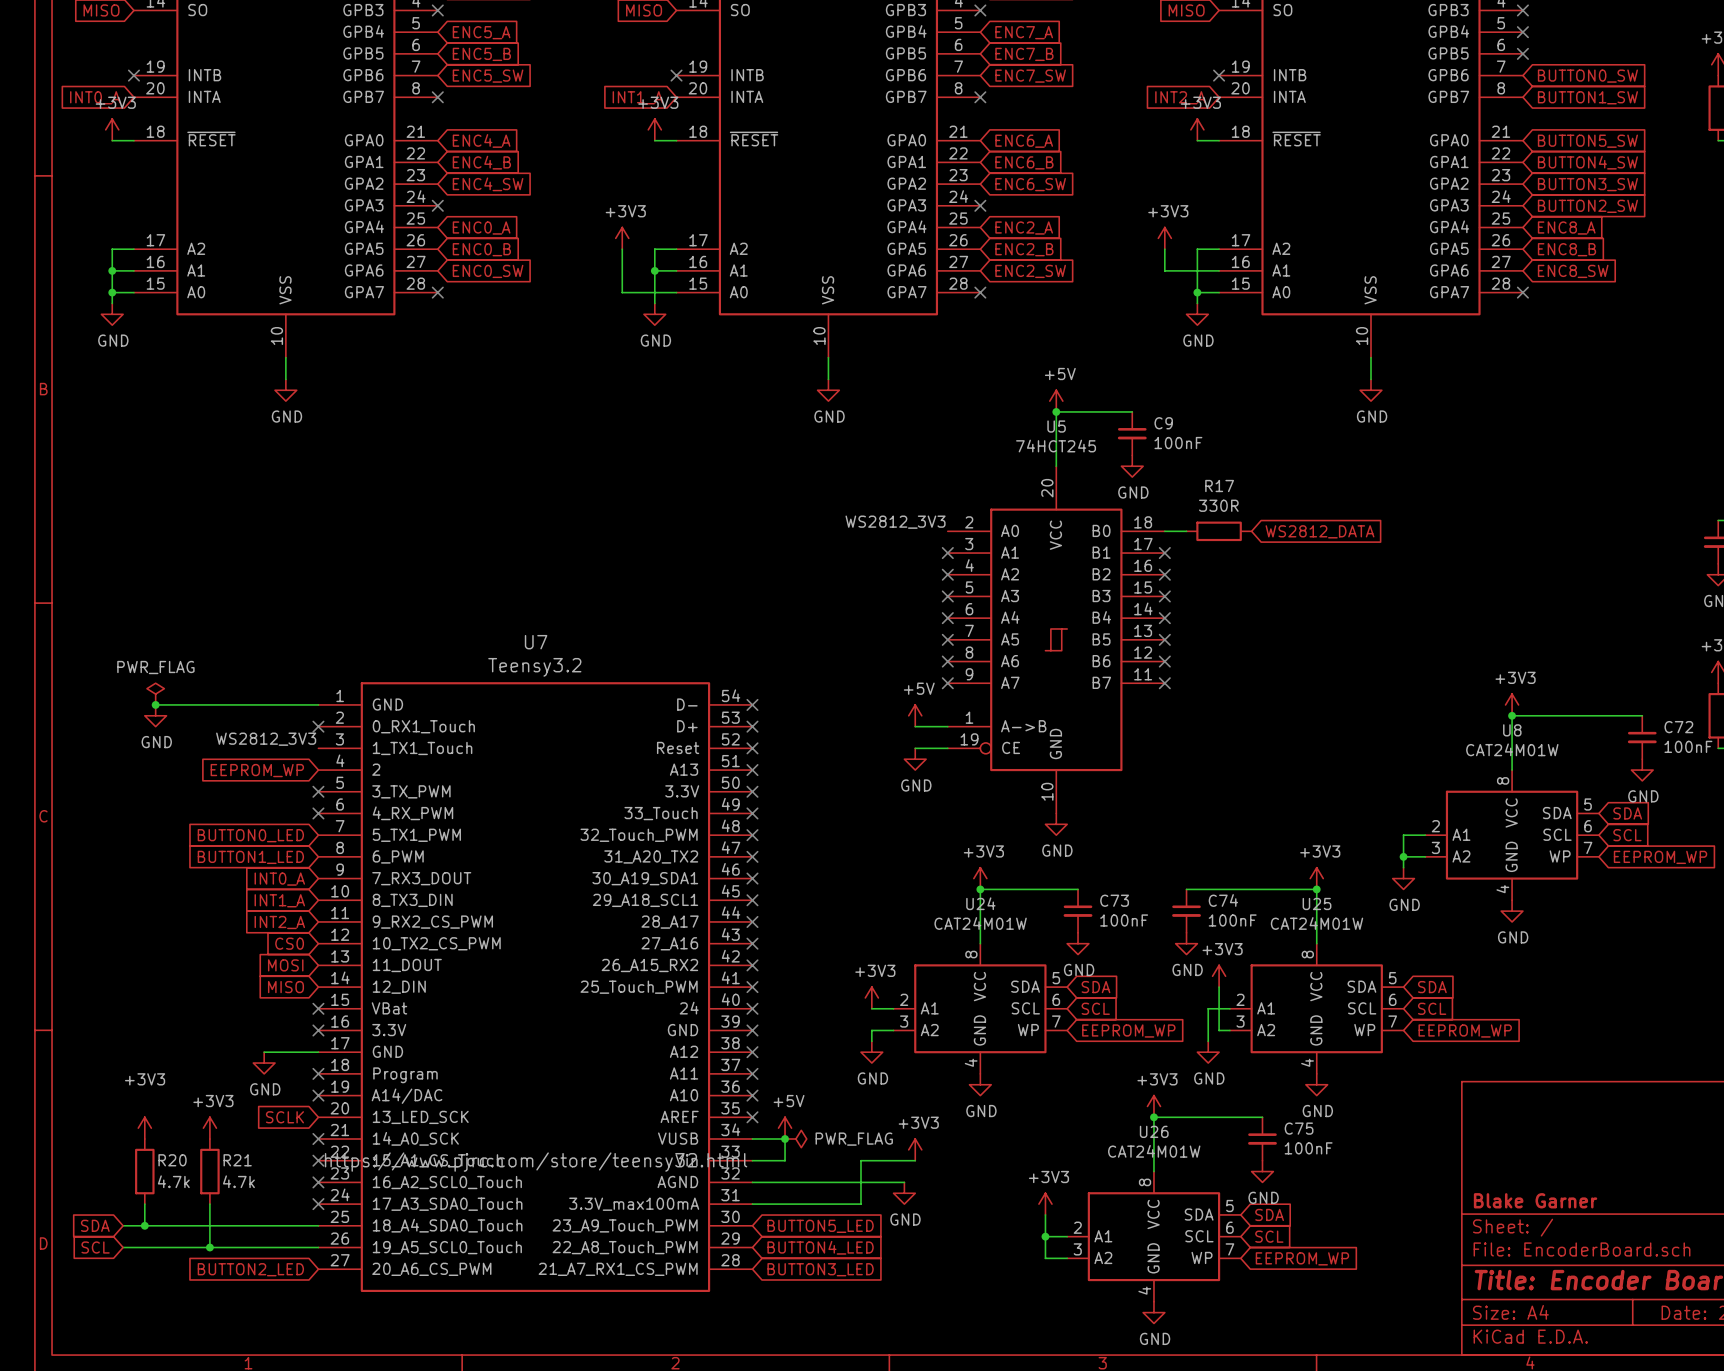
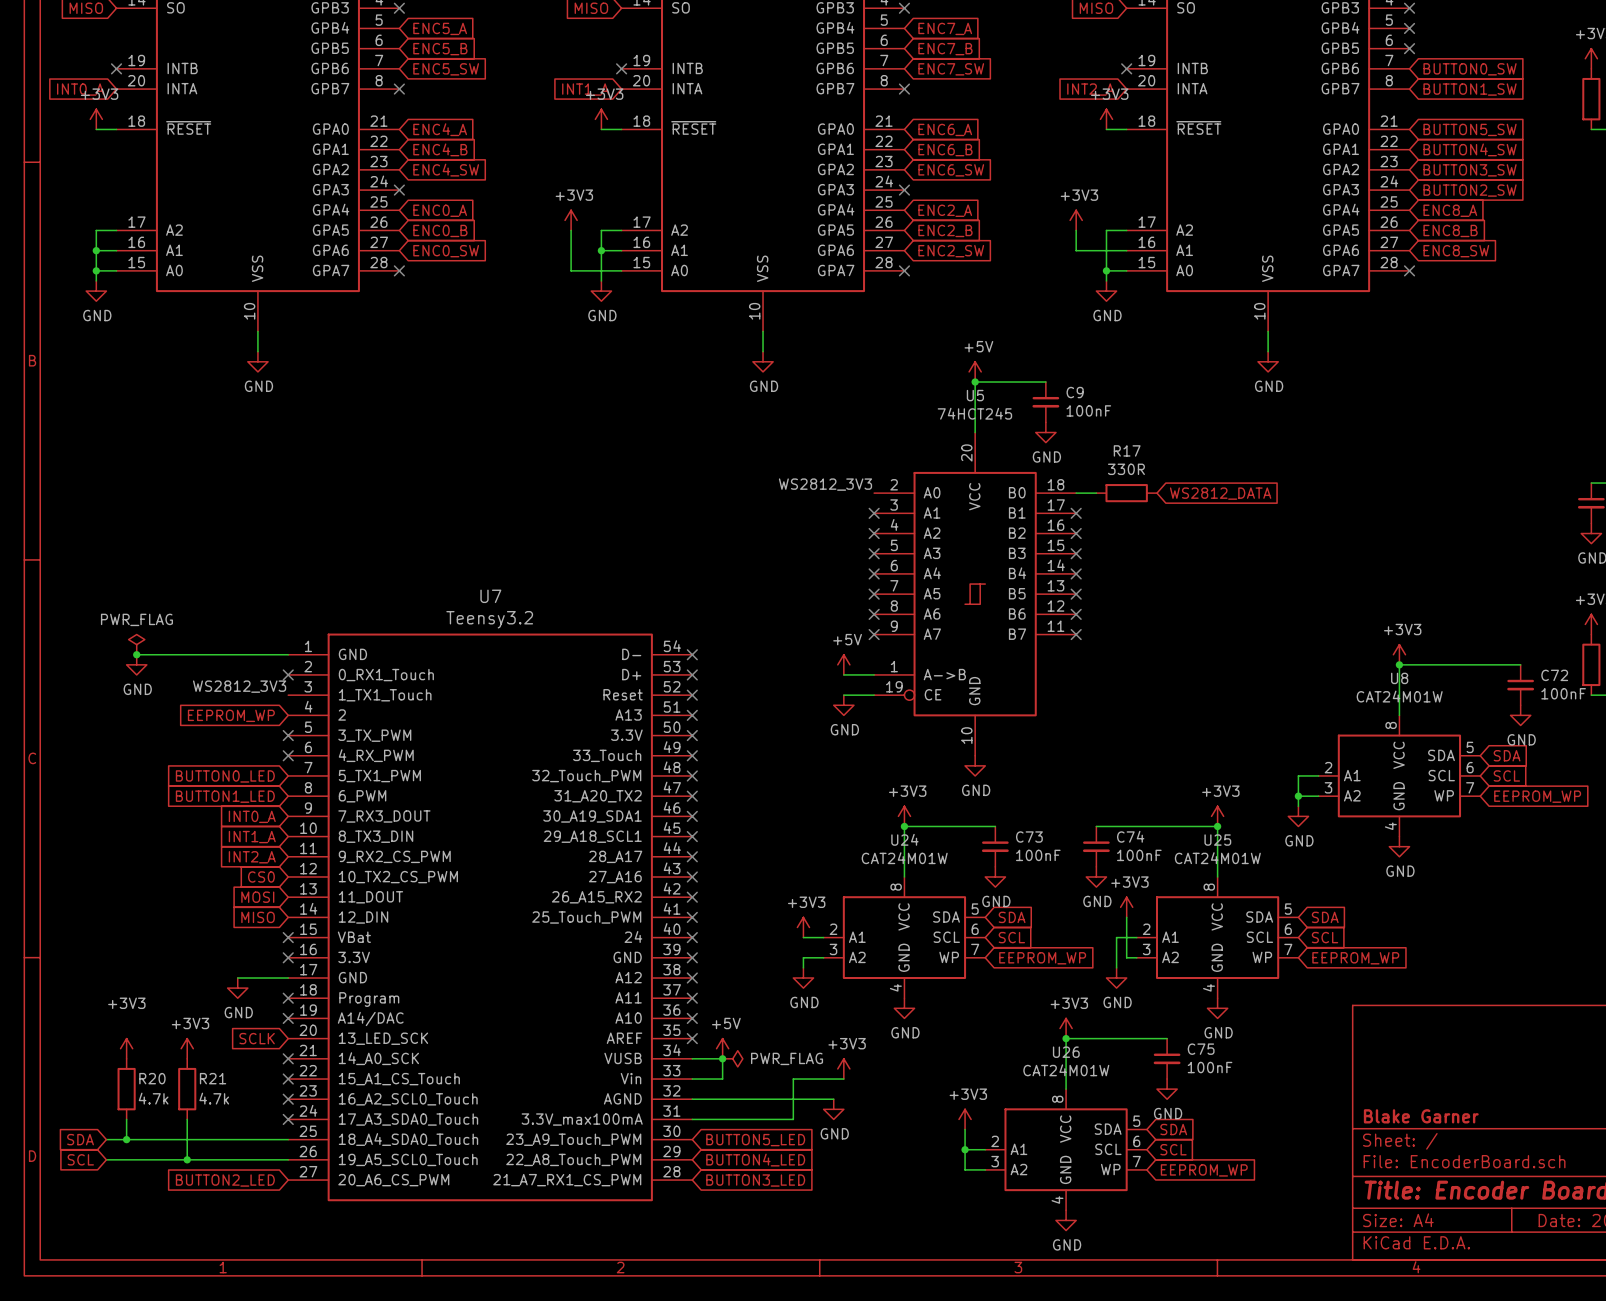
U7 text: https://www.pjrc.com/store/teensy32.html (536, 1162) -> none

